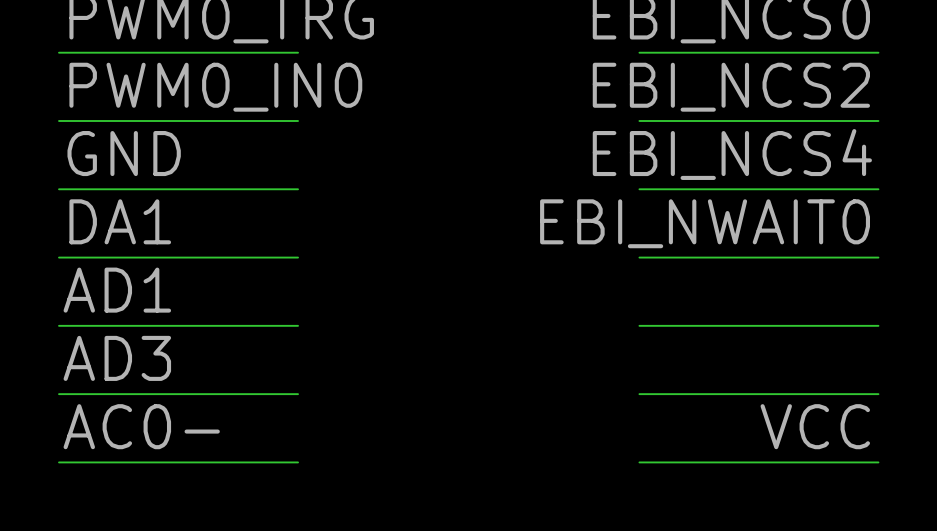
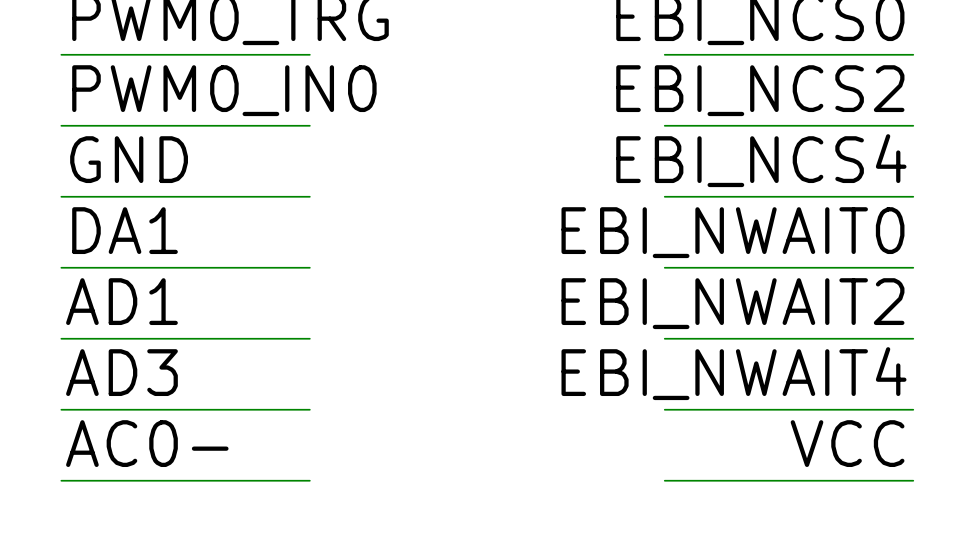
label: none -> EBI_NWAIT2 (732, 303)
label: none -> EBI_NWAIT4 (733, 373)

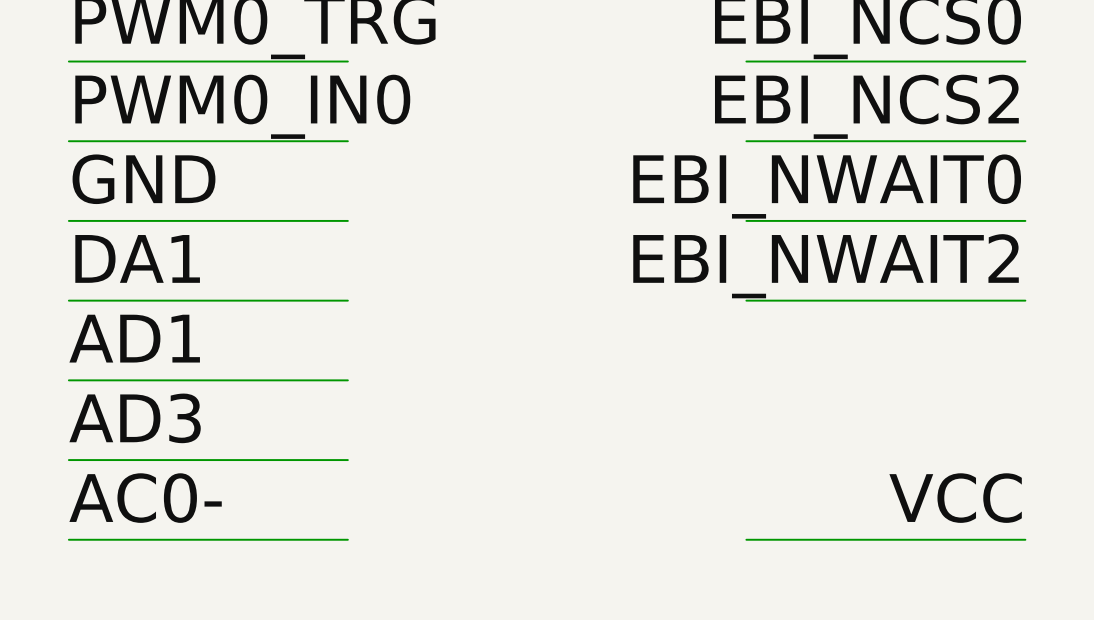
label: EBI_NCS4 (761, 160) -> EBI_NWAIT0 (827, 186)
label: EBI_NWAIT0 (732, 232) -> EBI_NWAIT2 (826, 266)
label: EBI_NWAIT2 (732, 303) -> none
wire: (664, 338) (913, 338) -> none
label: EBI_NWAIT4 (733, 373) -> none
wire: (664, 409) (913, 409) -> none

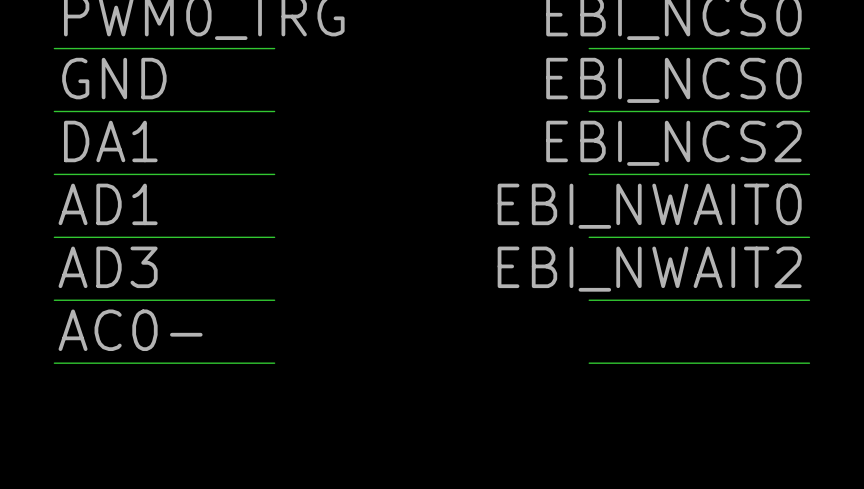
label: PWM0_IN0 (242, 106) -> GND (114, 78)
label: EBI_NCS2 (866, 106) -> EBI_NCS0 (673, 80)
label: GND (144, 179) -> DA1 (110, 141)
label: EBI_NWAIT0 (827, 186) -> EBI_NCS2 (673, 143)
label: DA1 (137, 258) -> AD1 (108, 204)
label: EBI_NWAIT2 (826, 266) -> EBI_NWAIT0 (649, 206)
label: AD1 (134, 338) -> AD3 (108, 267)
label: none -> EBI_NWAIT2 (649, 269)
label: AD3 (135, 418) -> AC0- (130, 330)
label: AC0- (145, 498) -> none
label: VCC (955, 498) -> none
wire: (68, 539) (347, 539) -> (589, 300) (809, 300)
wire: (746, 539) (1025, 539) -> (589, 363) (809, 363)

